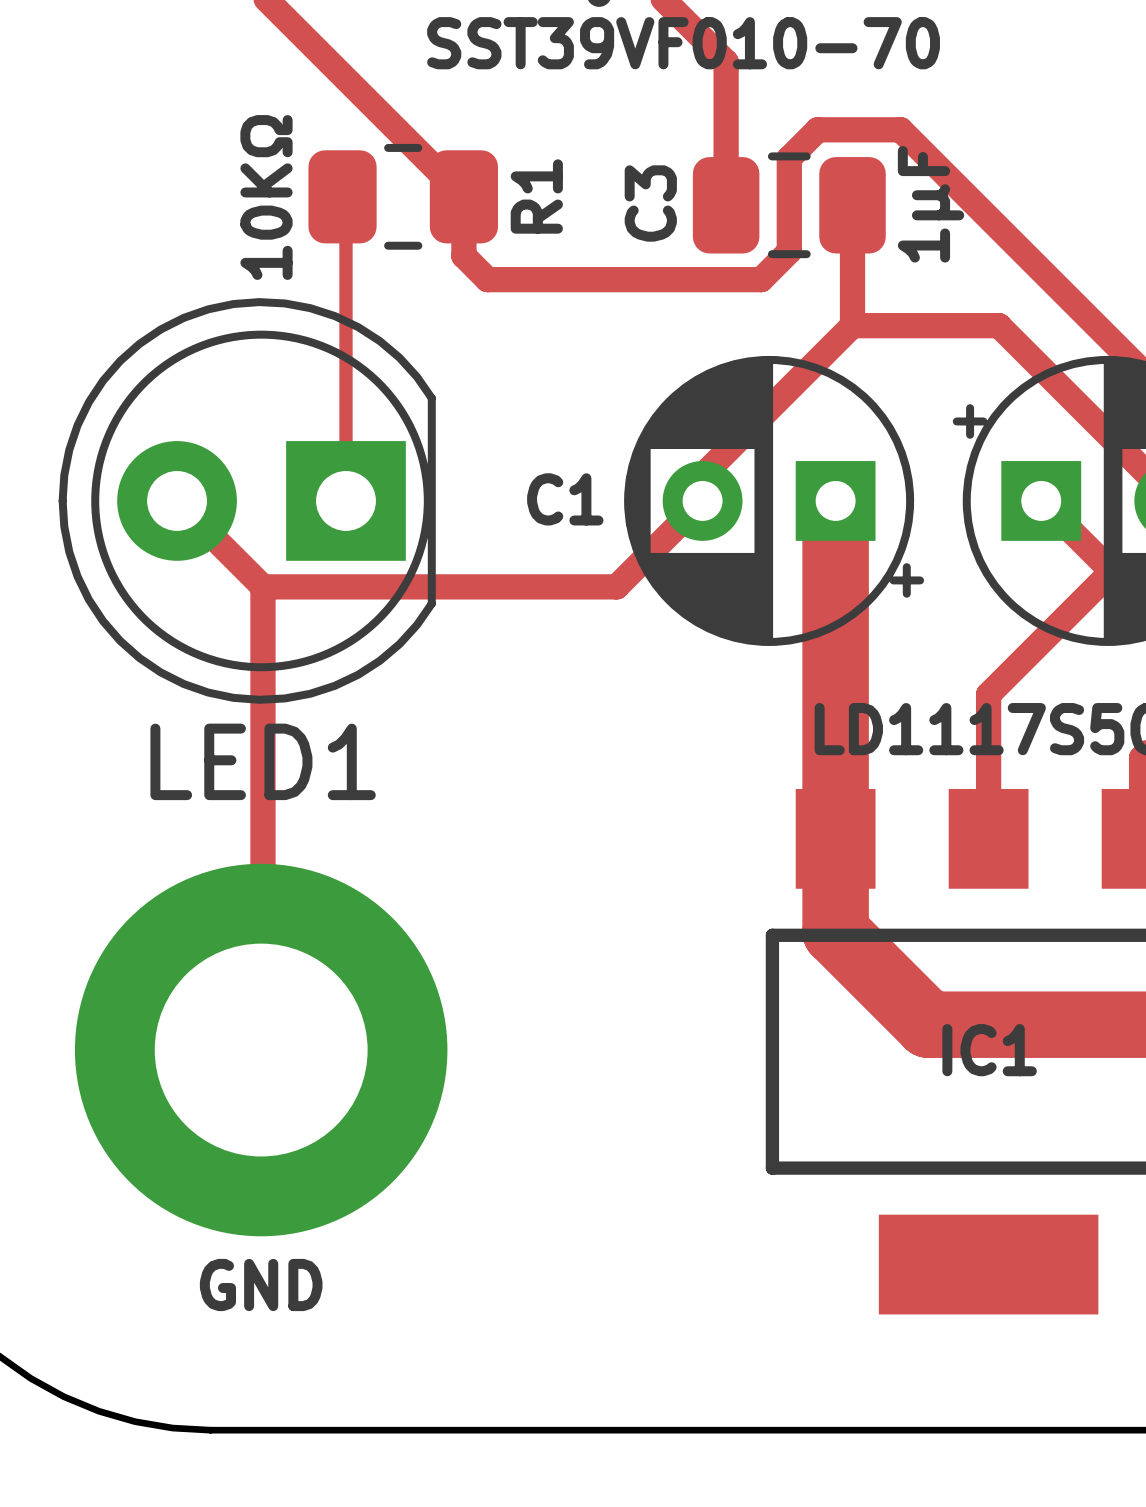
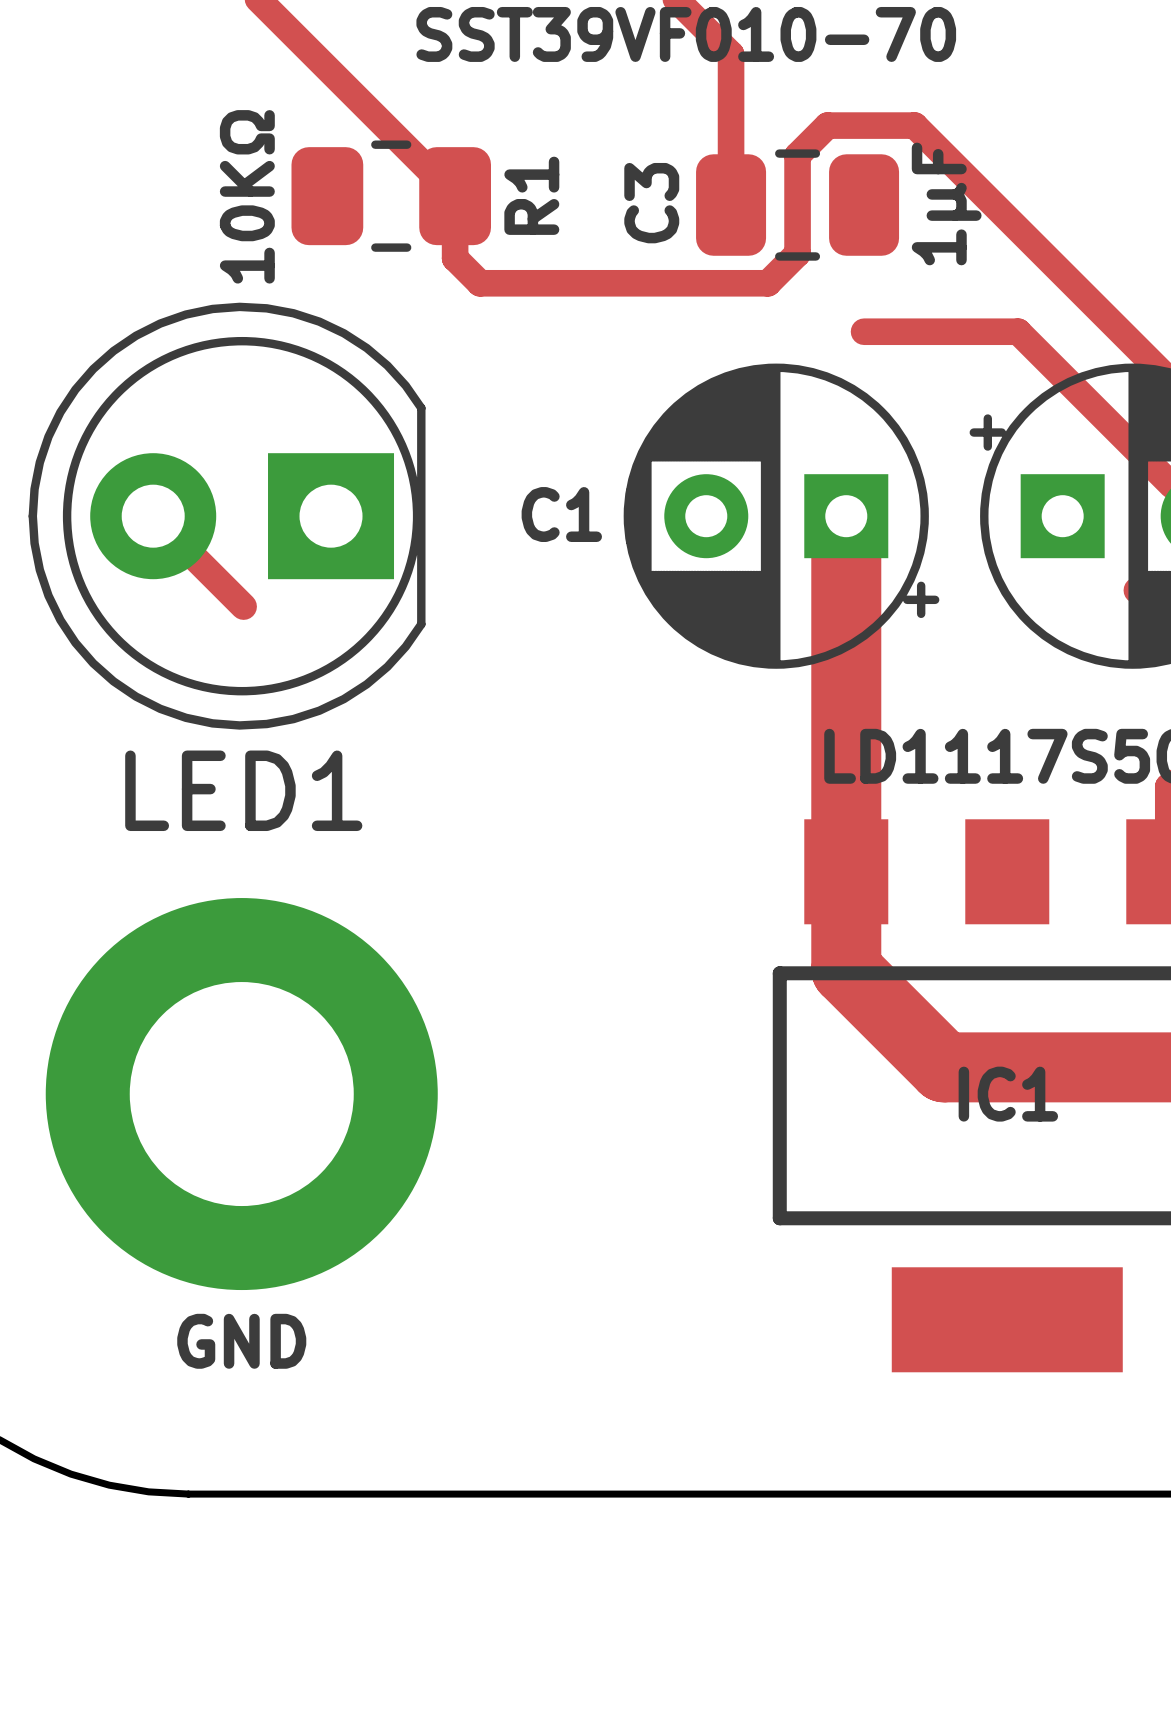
track: (345, 200) (345, 500) -> none
track: (852, 205) (852, 325) (702, 475) -> none
track: (702, 500) (616, 586) (262, 586) (262, 1048) -> none
track: (1041, 500) (1111, 571) (988, 694) (988, 838) -> none

